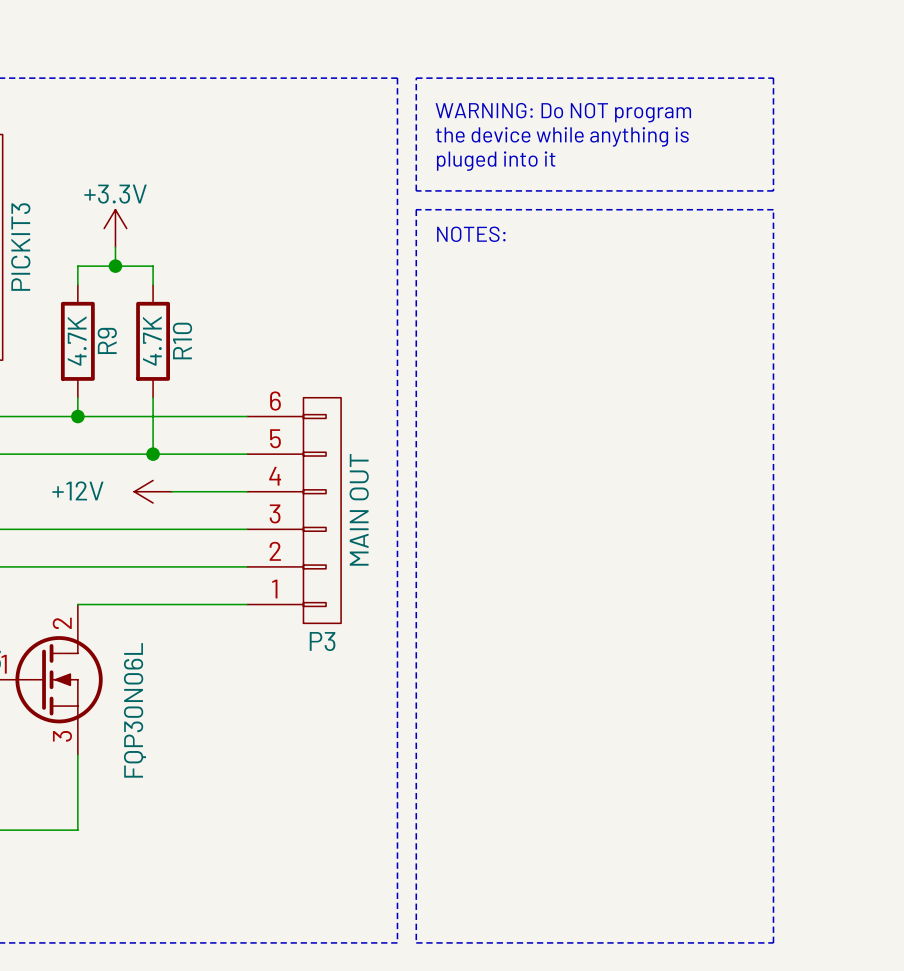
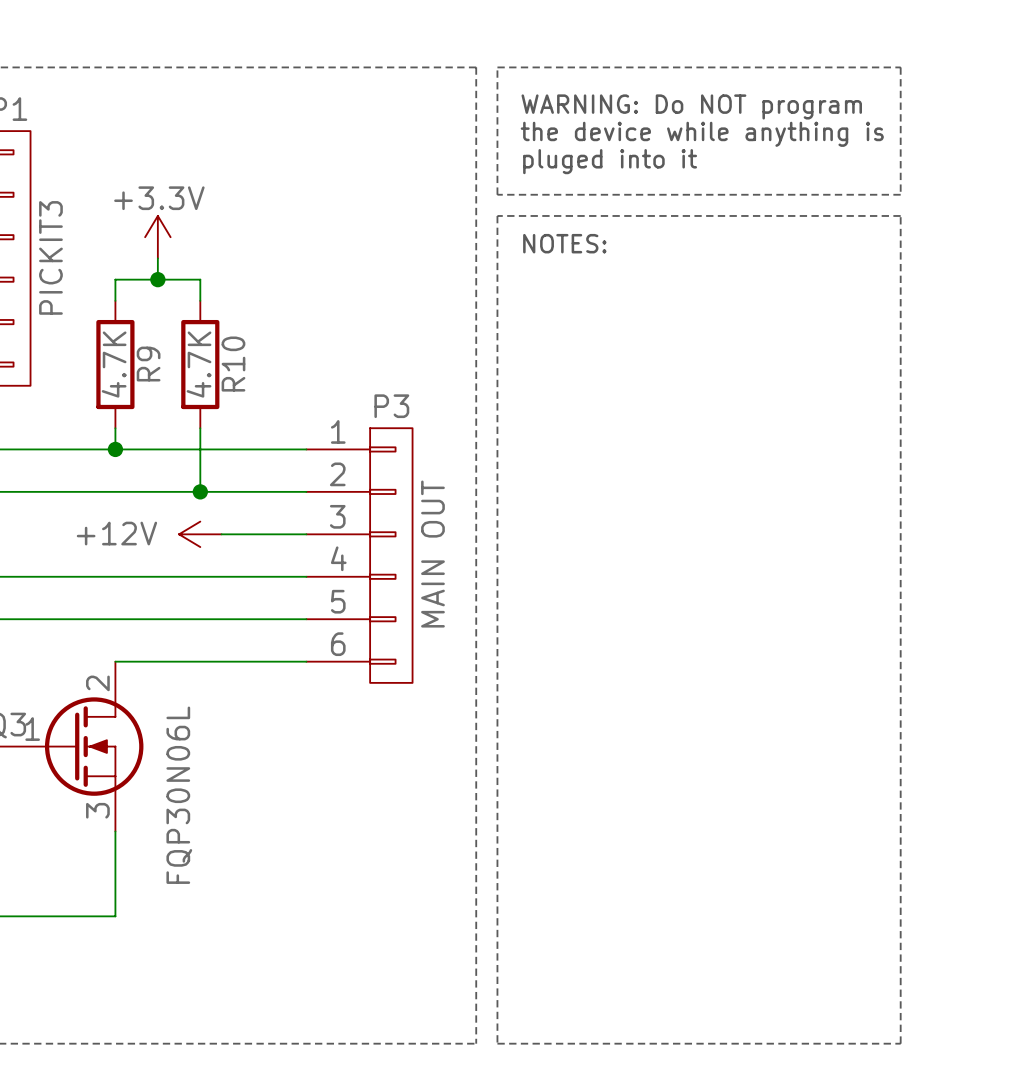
P3 flip: as is (322, 510) -> up-down (391, 555)

